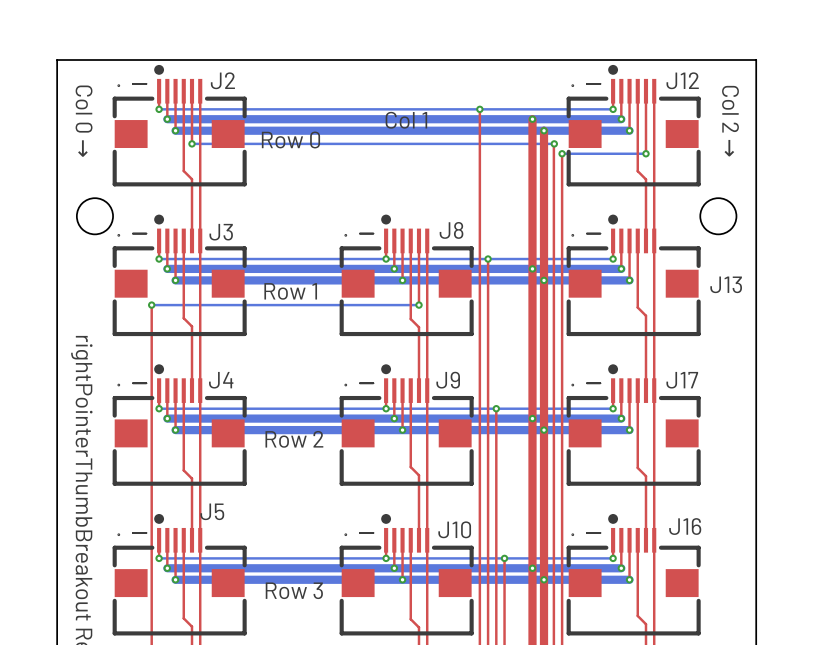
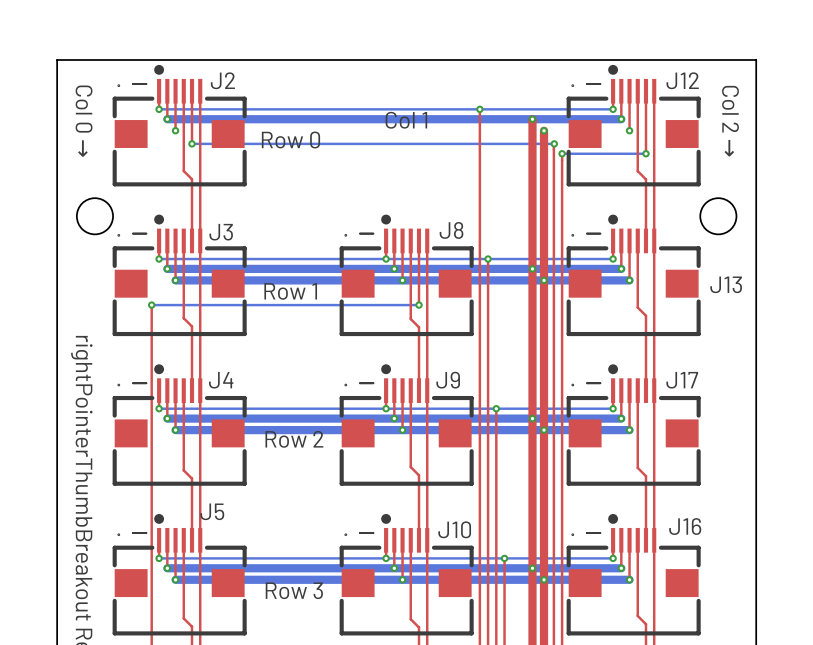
bottom track: (175, 130) (629, 130) -> none

